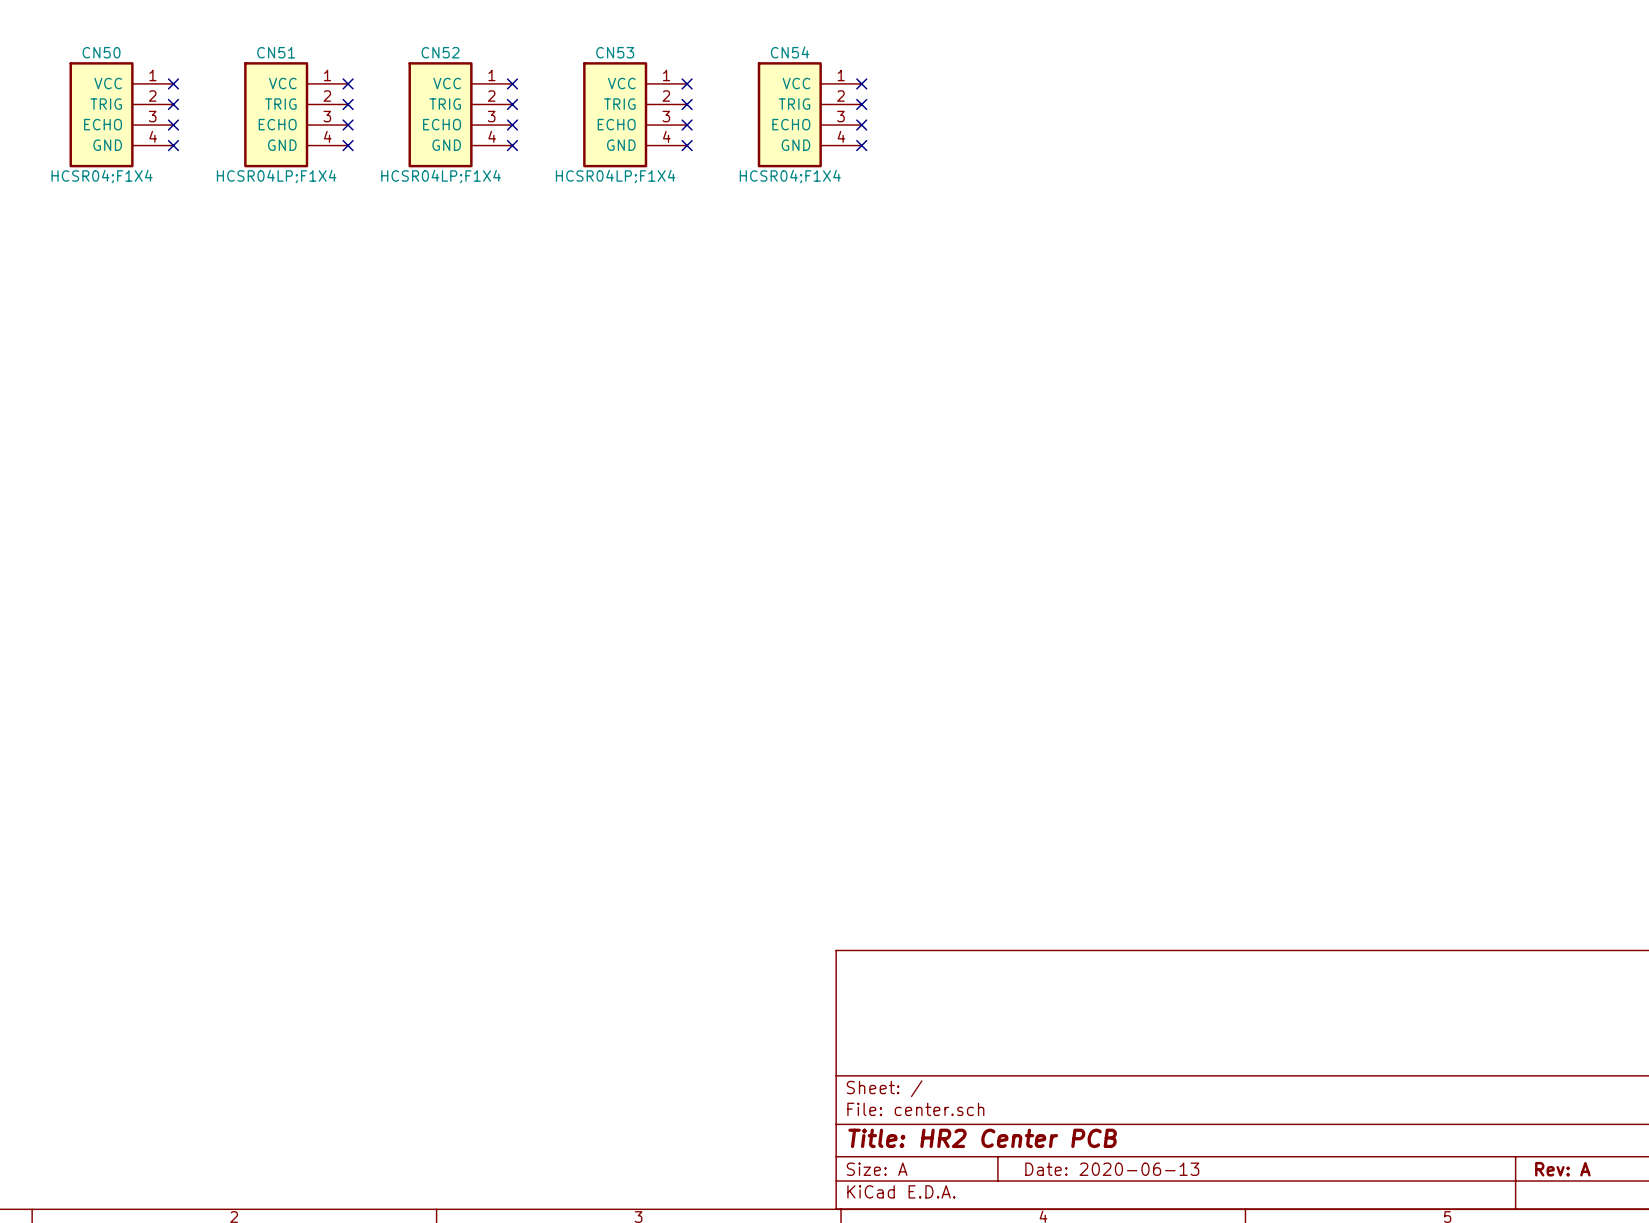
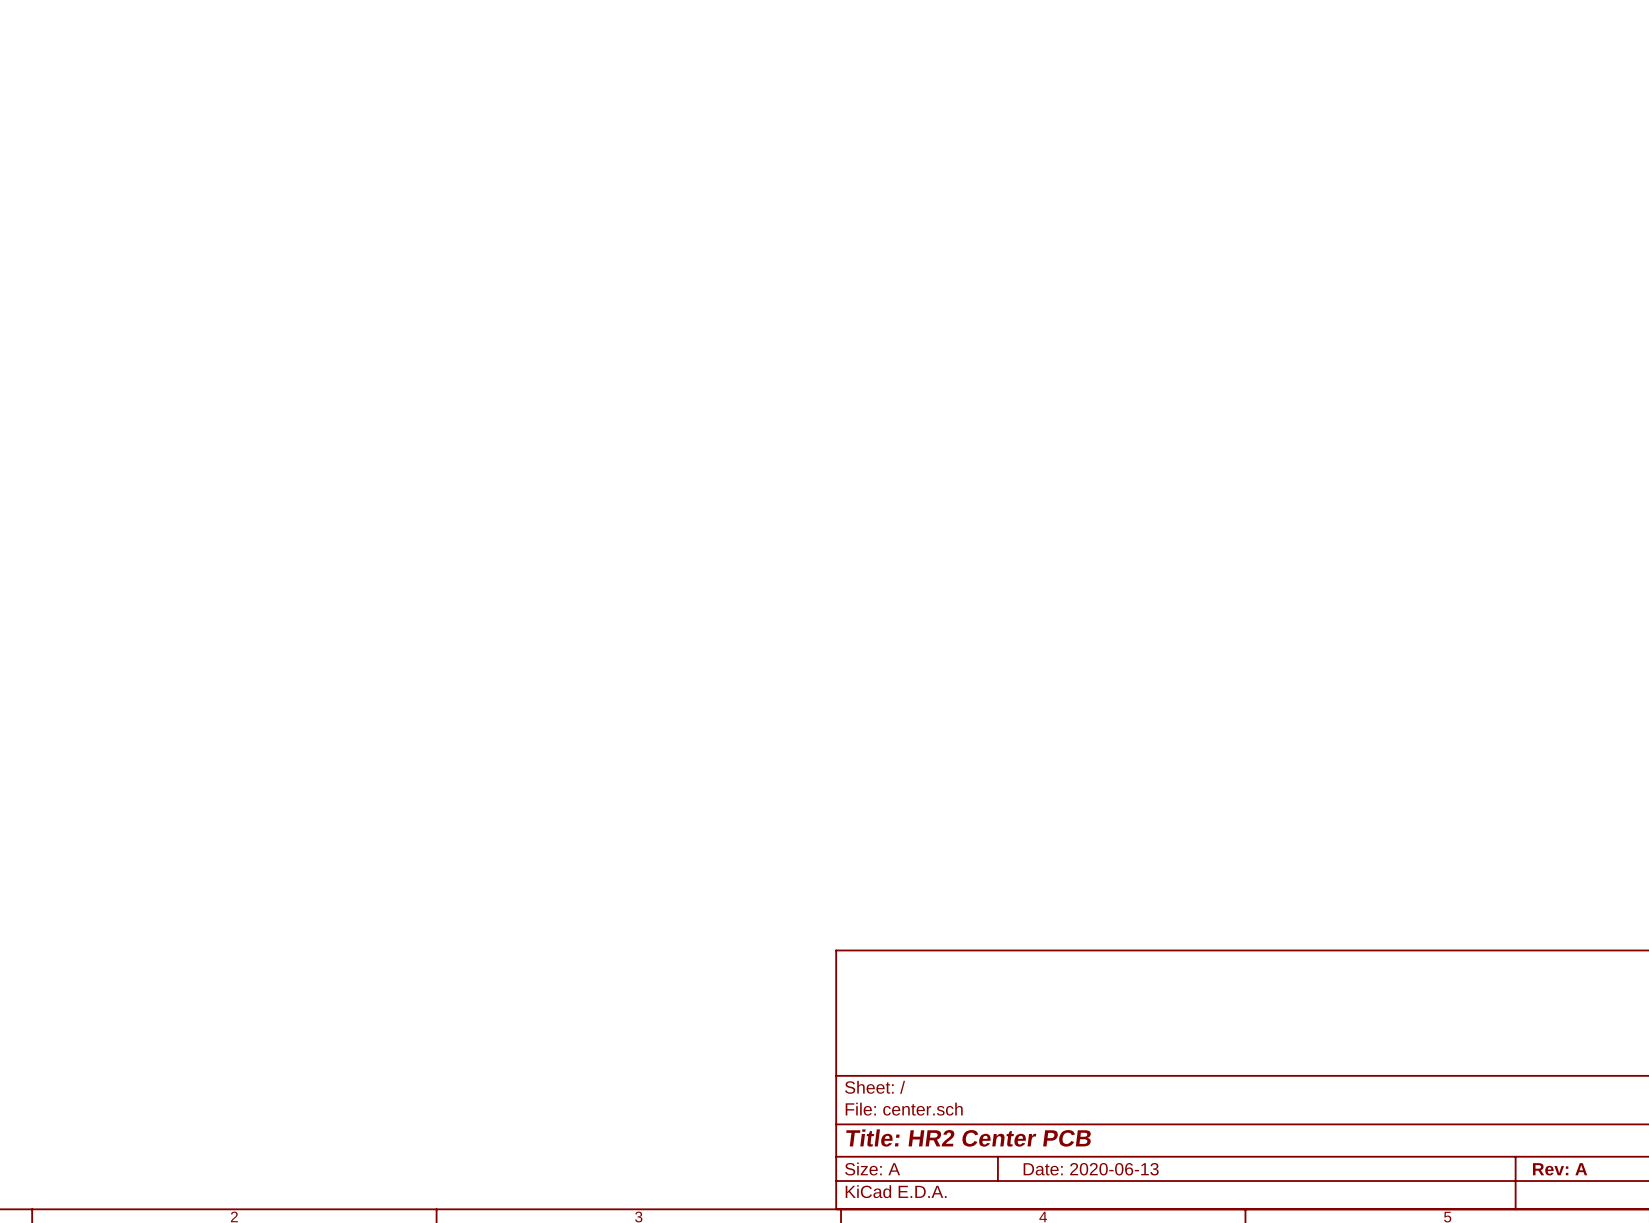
no-connect mark: (173, 83) -> none
no-connect mark: (348, 83) -> none
no-connect mark: (512, 83) -> none
no-connect mark: (687, 83) -> none
no-connect mark: (861, 83) -> none
no-connect mark: (173, 104) -> none
no-connect mark: (348, 104) -> none
no-connect mark: (512, 104) -> none
no-connect mark: (687, 104) -> none
no-connect mark: (861, 104) -> none
CN50: HCSR04;F1X4 (121, 114) -> none
CN51: HCSR04LP;F1X4 (296, 114) -> none
CN52: HCSR04LP;F1X4 (460, 114) -> none
CN53: HCSR04LP;F1X4 (635, 114) -> none
CN54: HCSR04;F1X4 (809, 114) -> none
no-connect mark: (173, 125) -> none
no-connect mark: (348, 125) -> none
no-connect mark: (512, 125) -> none
no-connect mark: (687, 125) -> none
no-connect mark: (861, 125) -> none
no-connect mark: (173, 145) -> none
no-connect mark: (348, 145) -> none
no-connect mark: (512, 145) -> none
no-connect mark: (687, 145) -> none
no-connect mark: (861, 145) -> none

